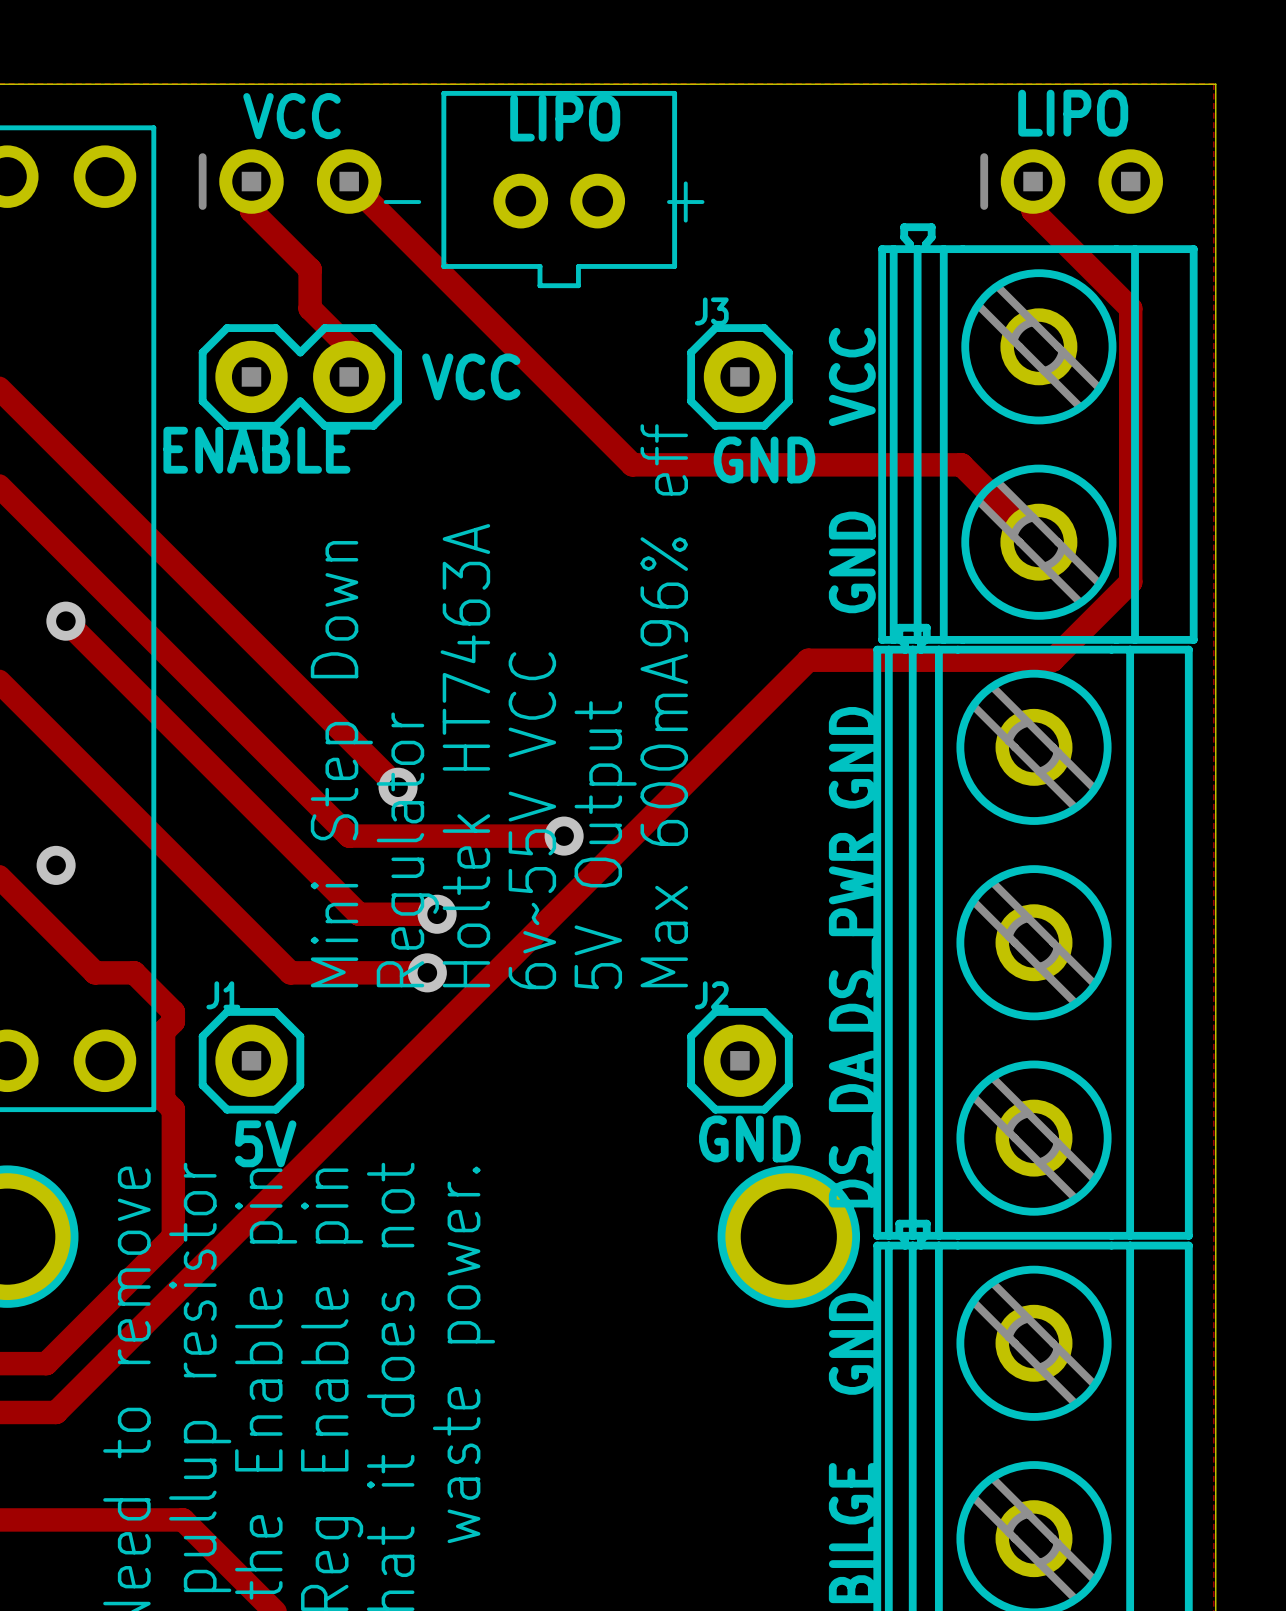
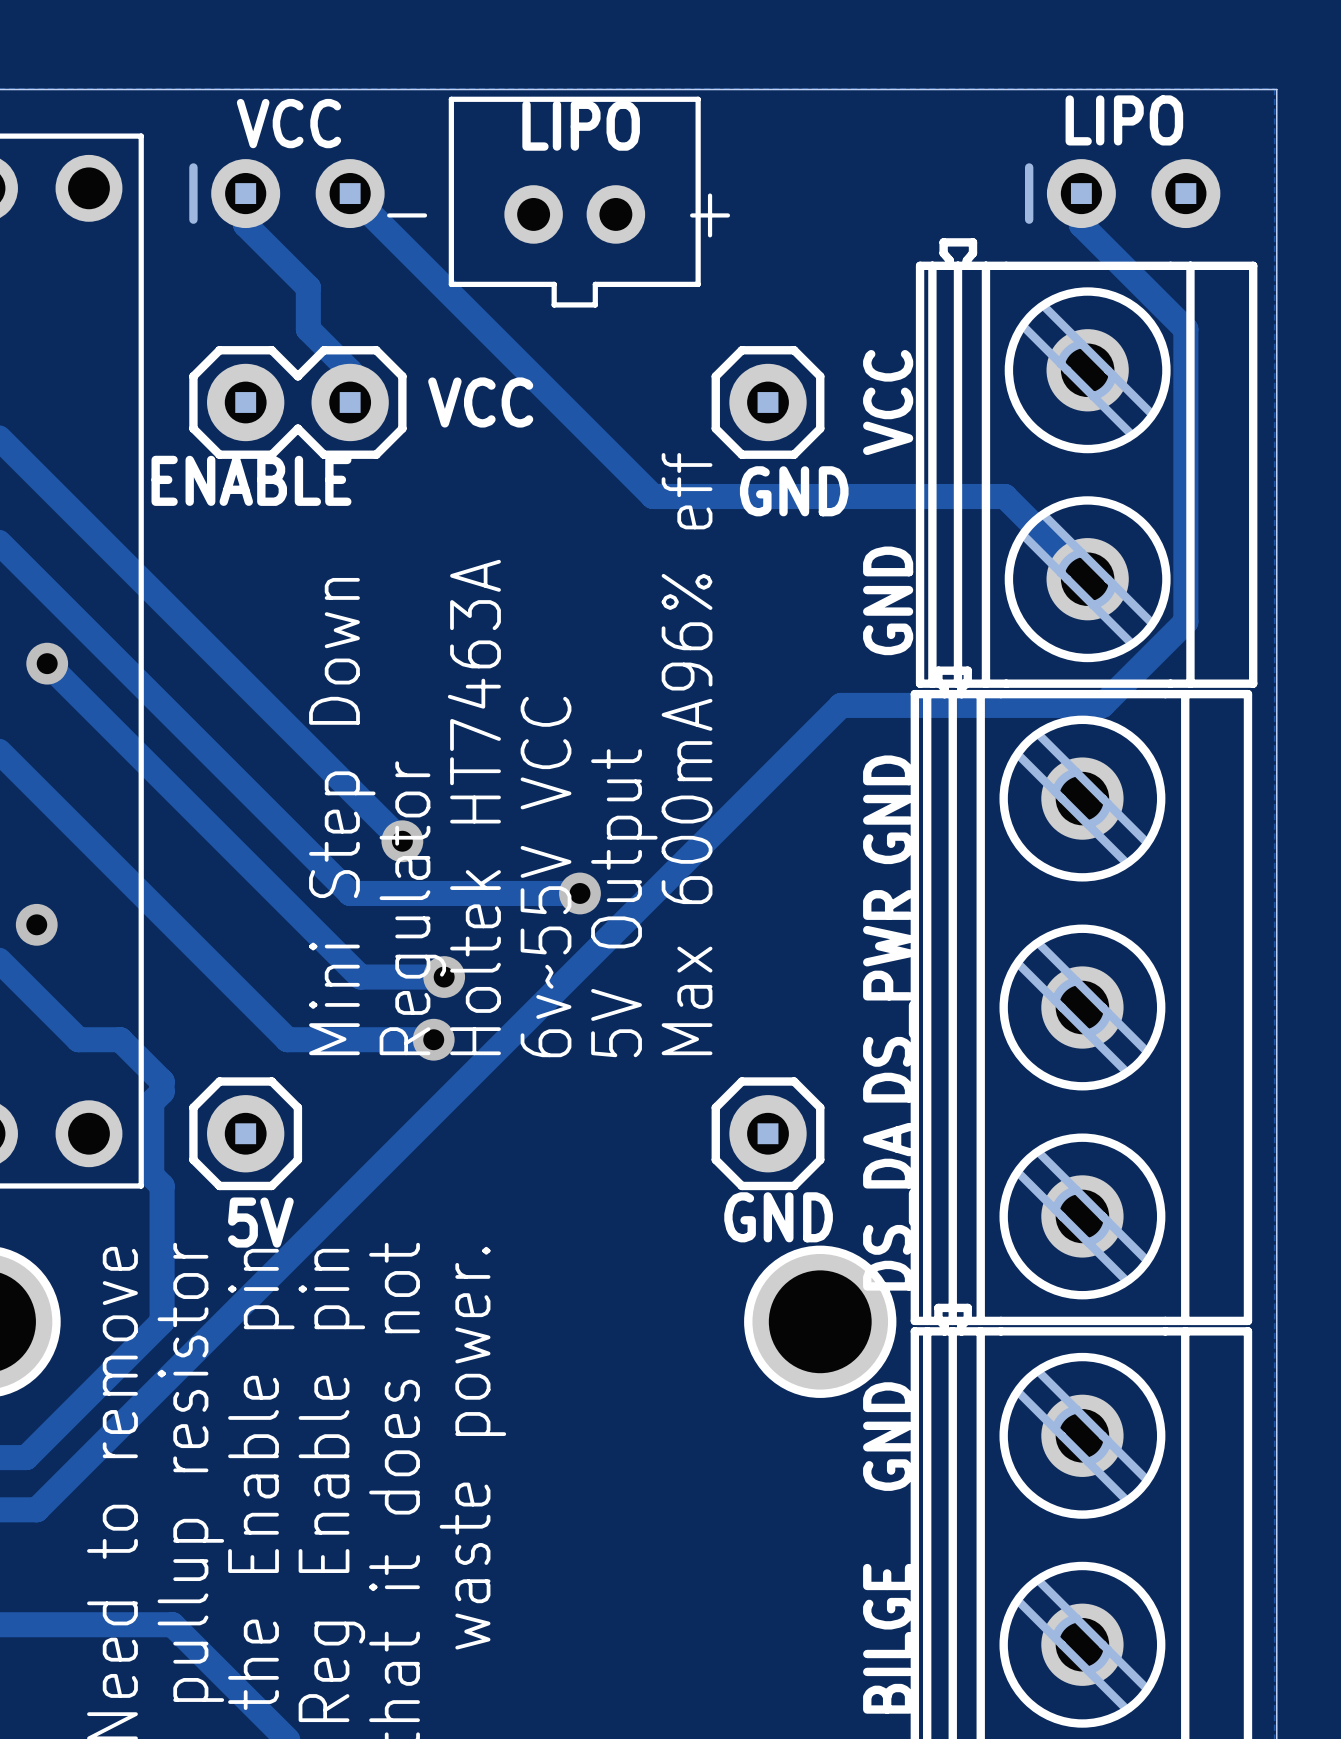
J3 name: J3 (711, 311) -> none
J1 name: J1 (223, 995) -> none
J2 name: J2 (711, 995) -> none

